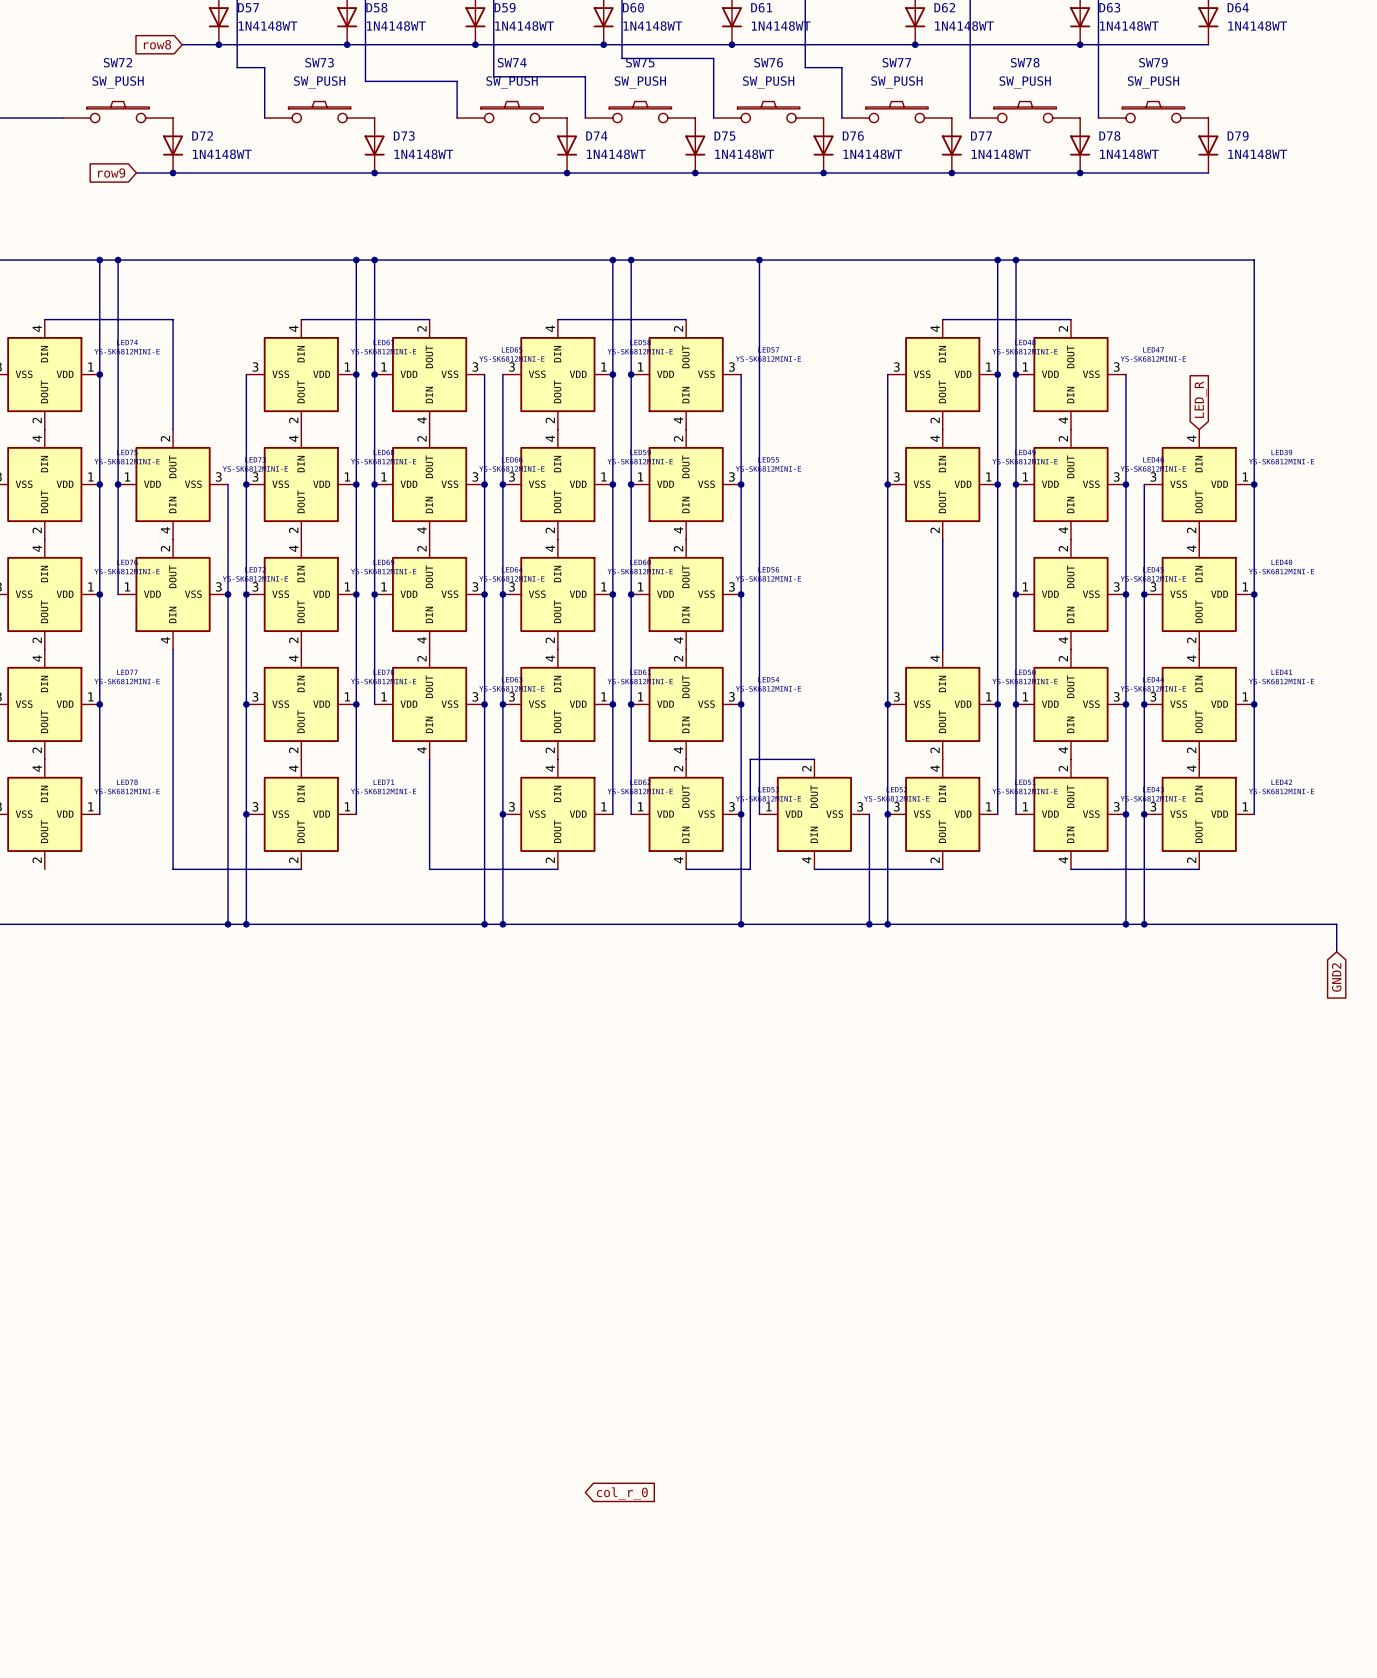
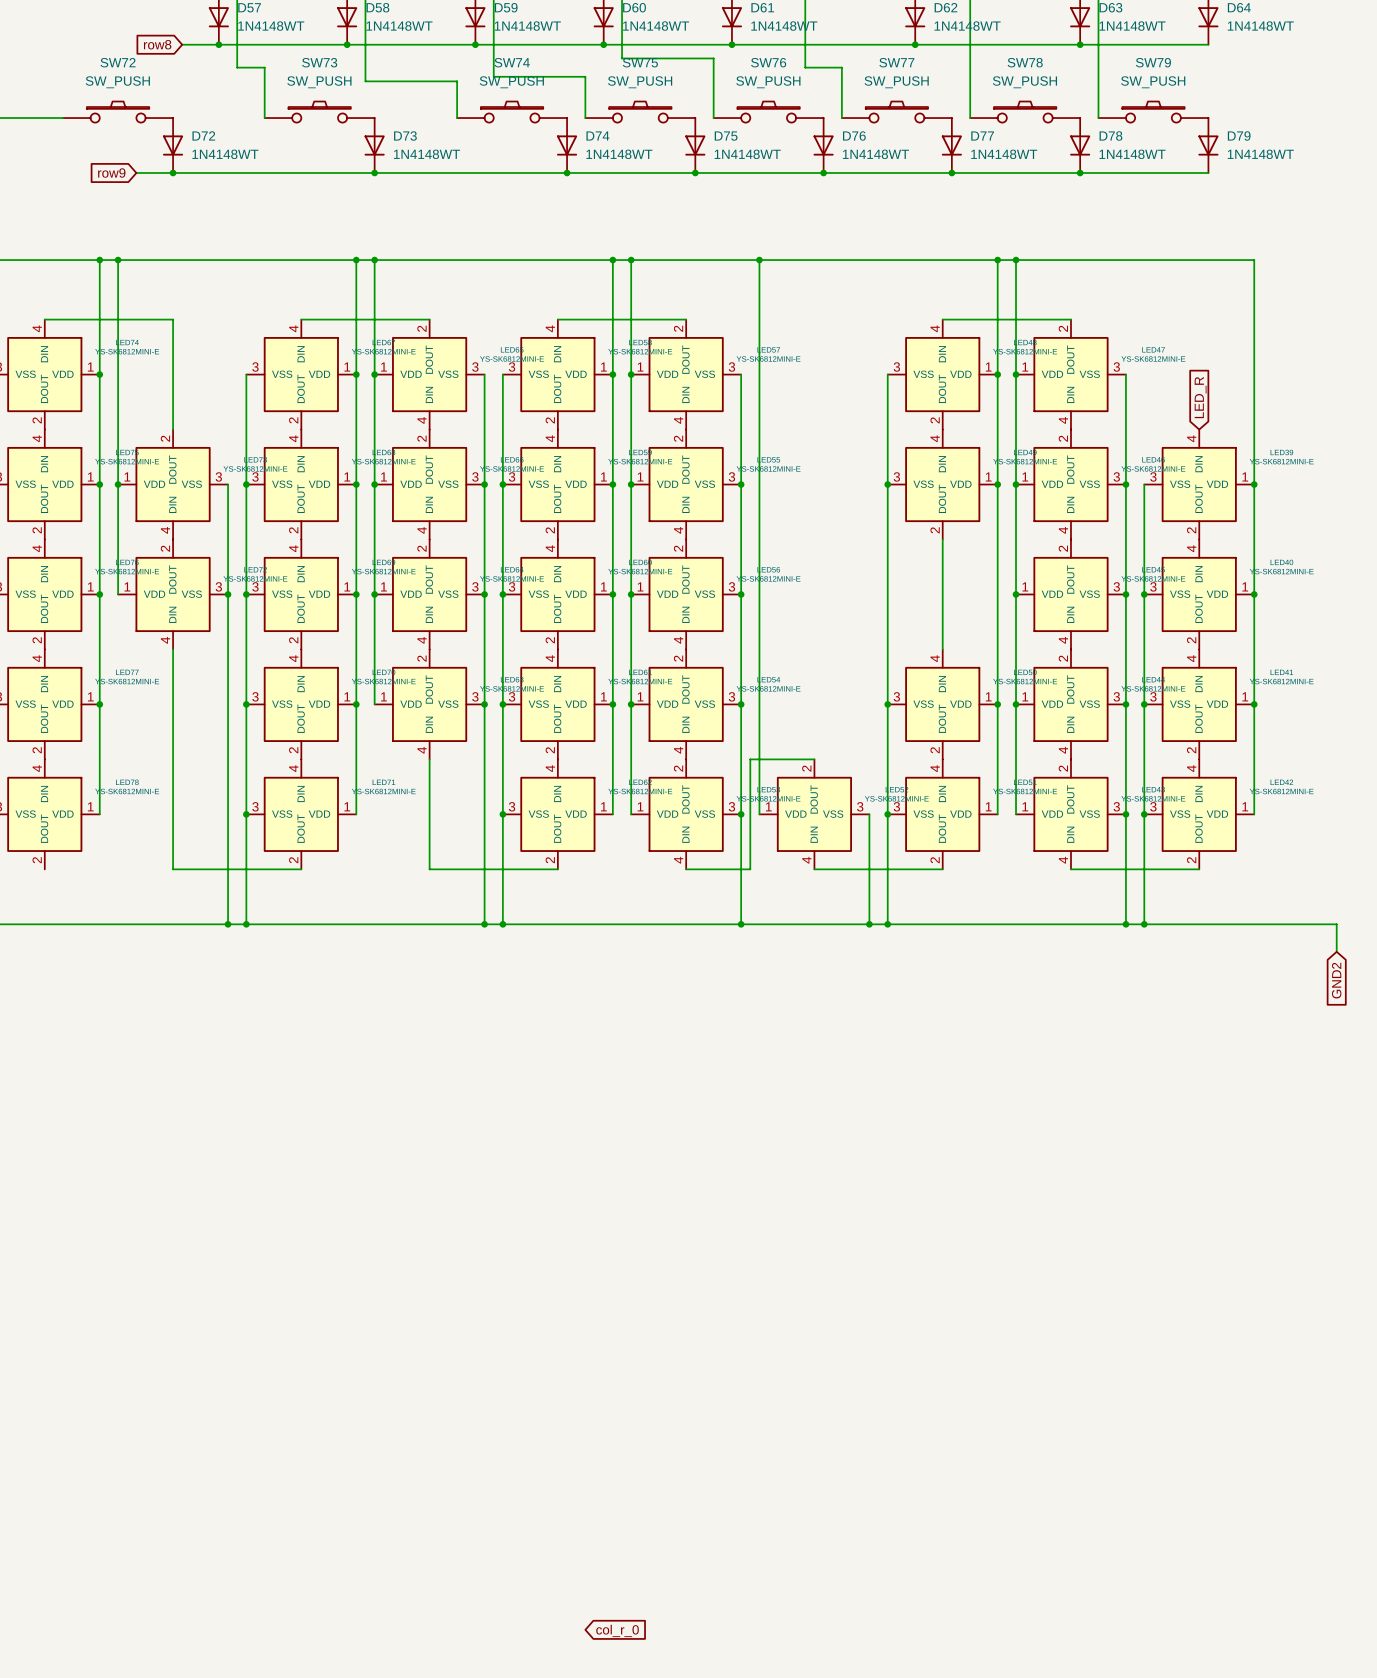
global label position: col_r_0 (622, 1493) -> col_r_0 (617, 1630)

